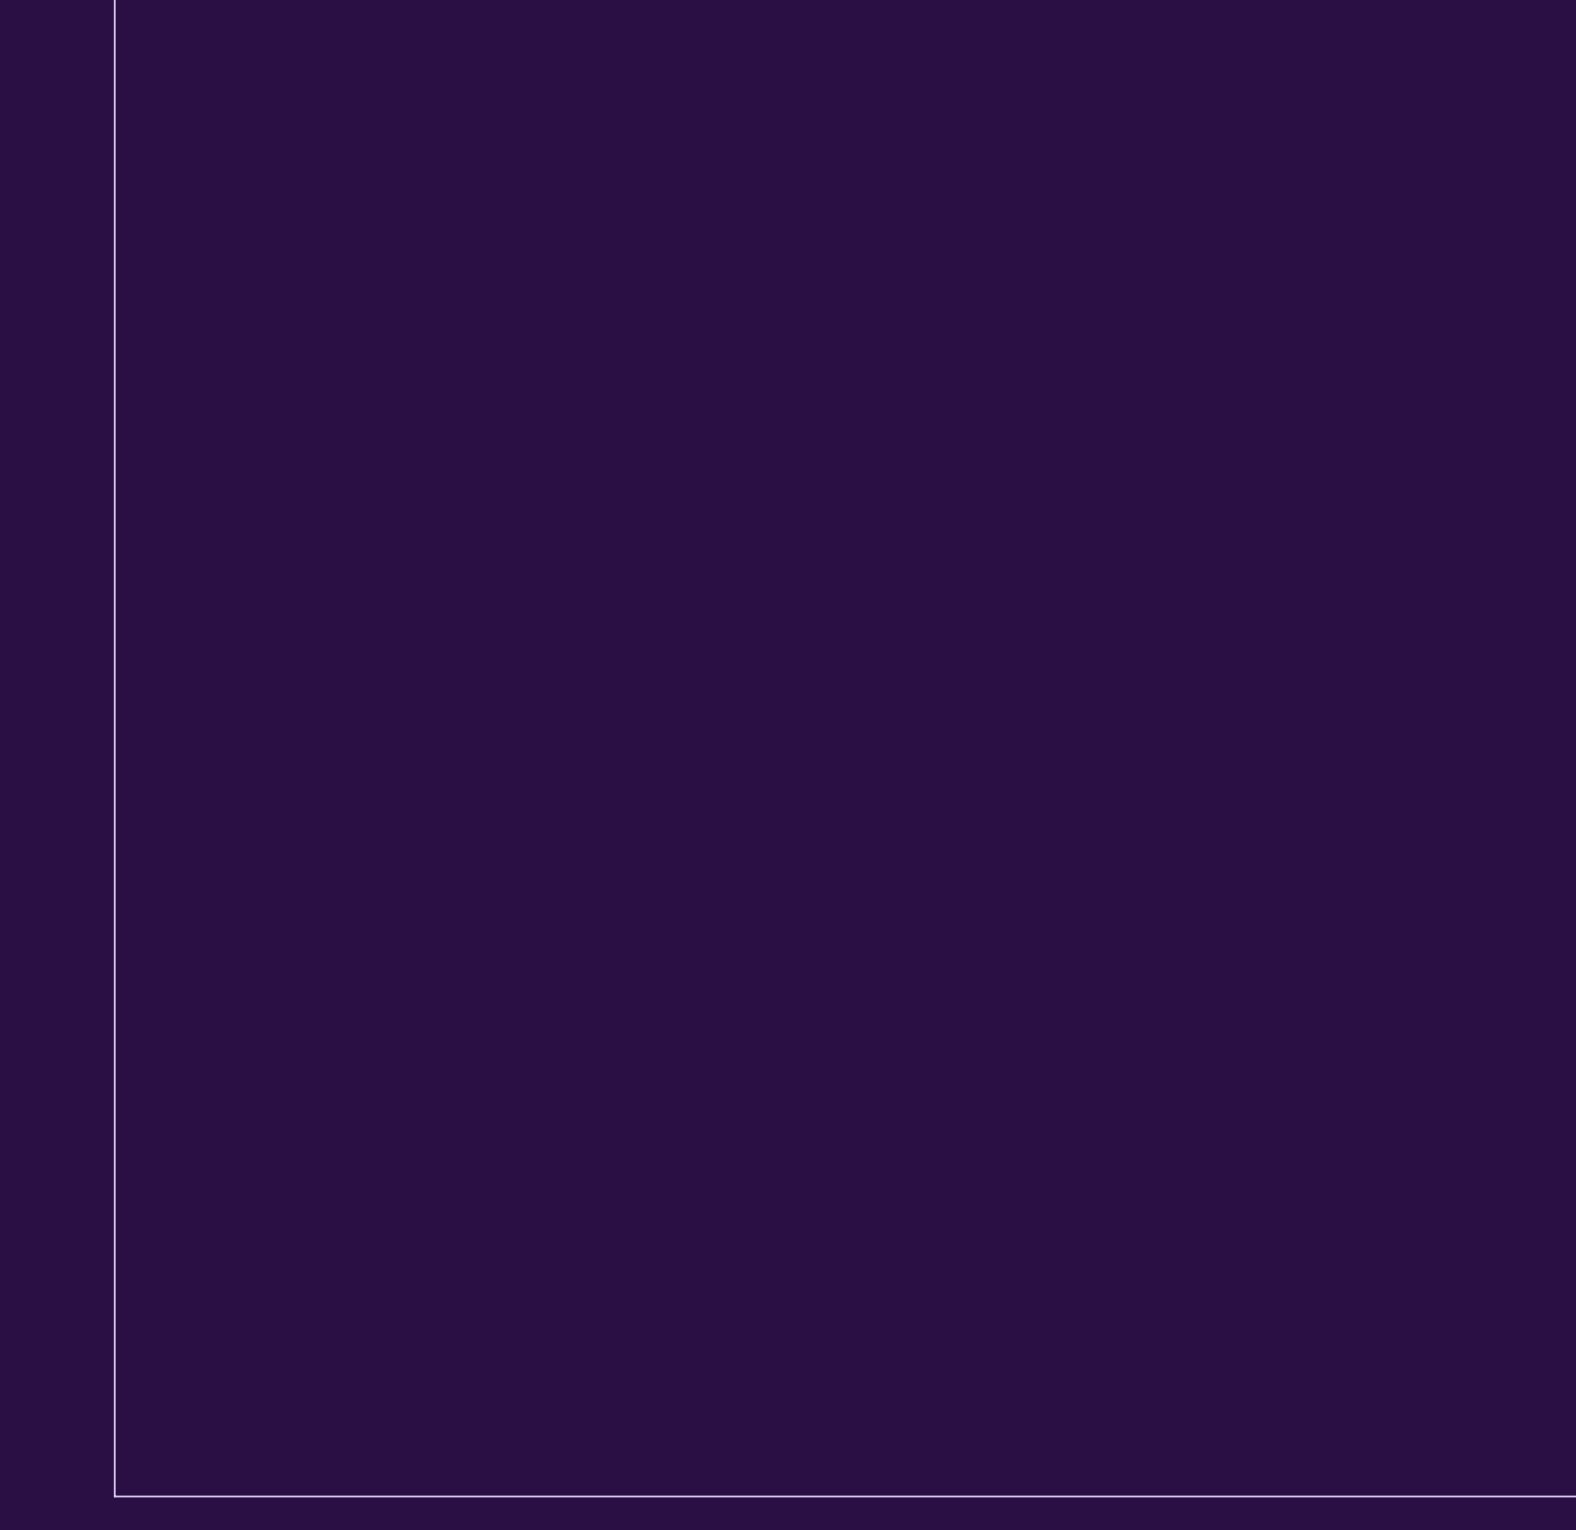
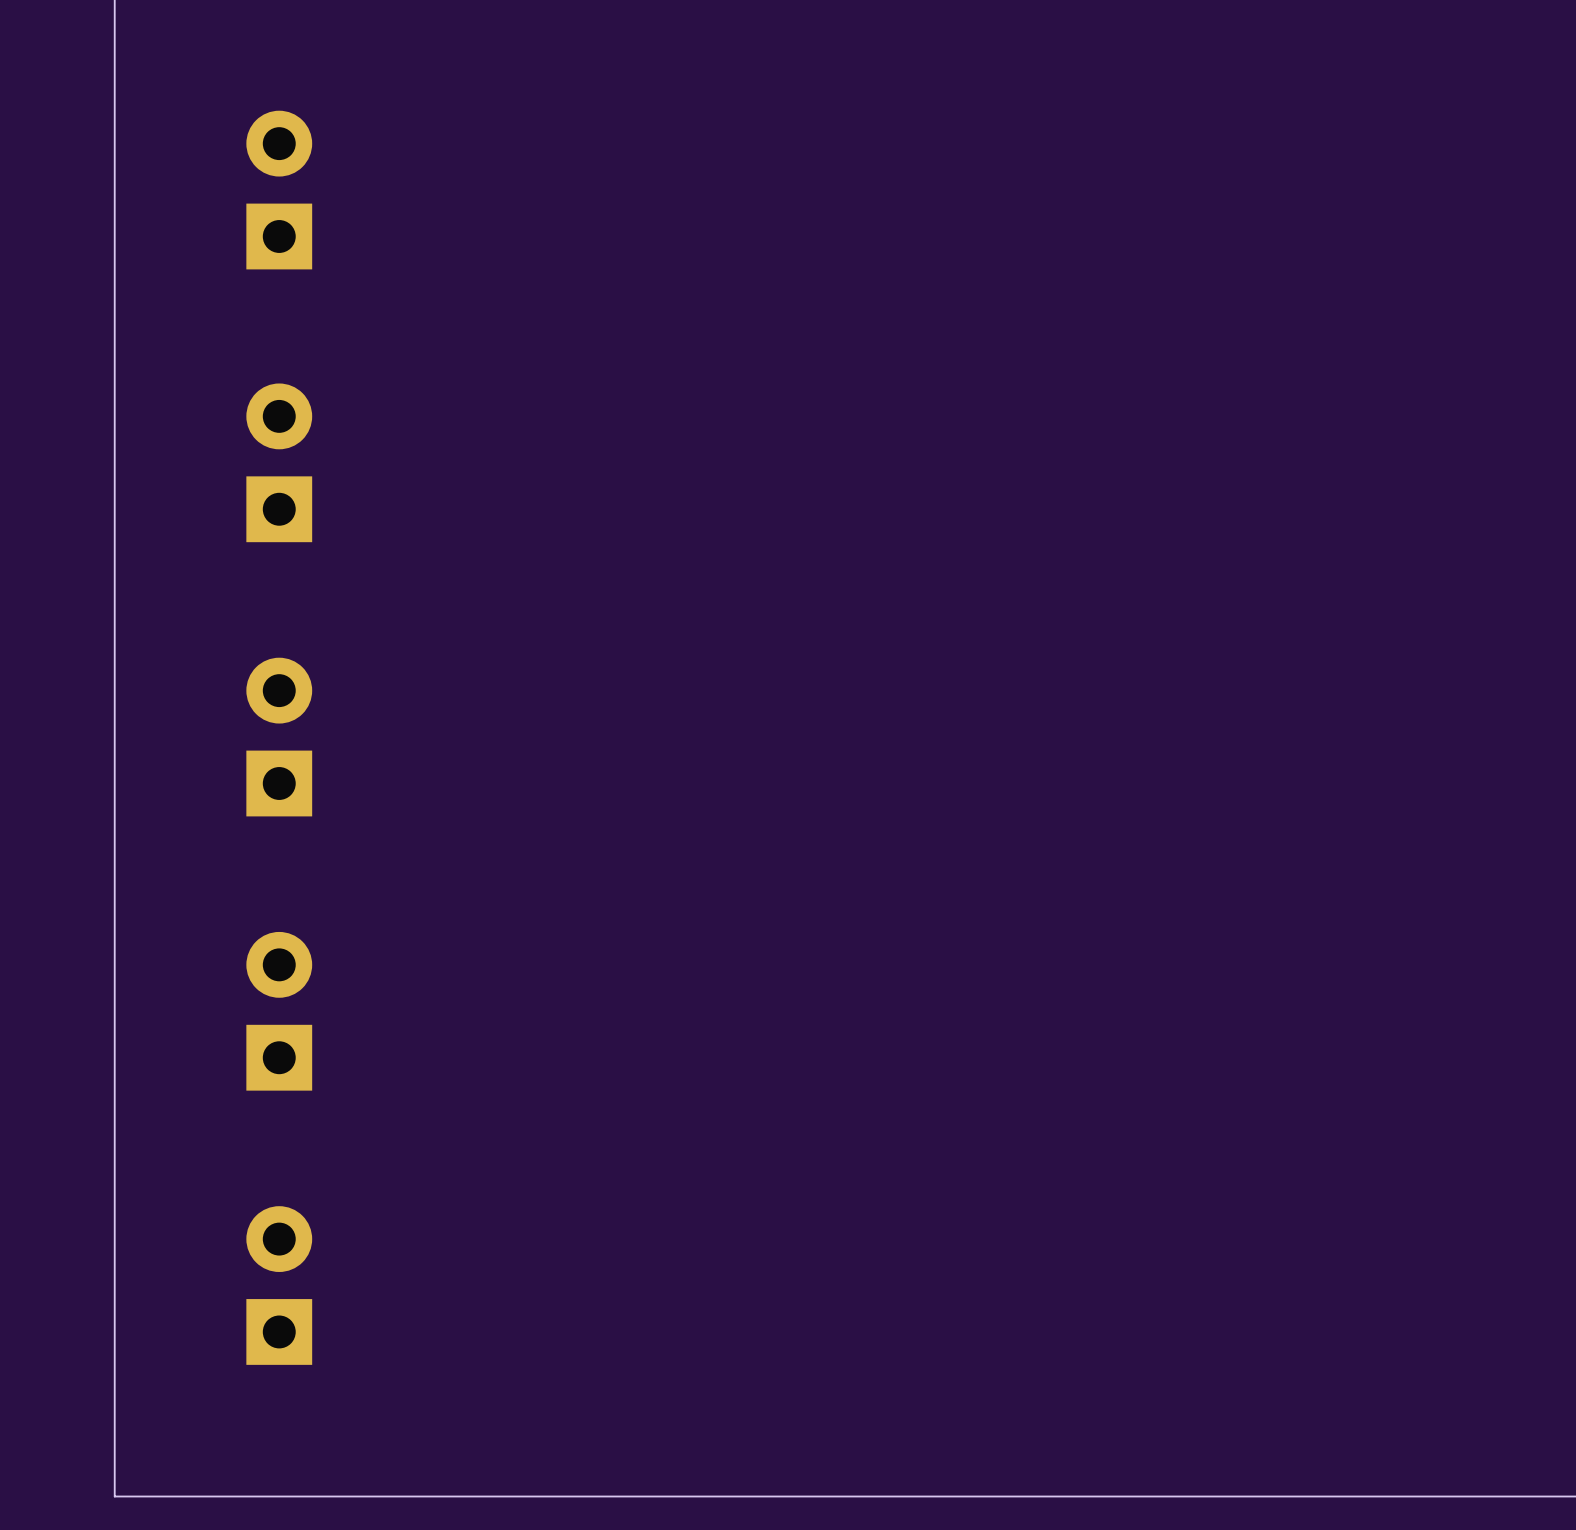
part: none -> (279, 190)
part: none -> (279, 462)
part: none -> (279, 737)
part: none -> (279, 1011)
part: none -> (279, 1285)

